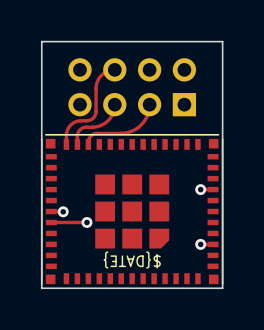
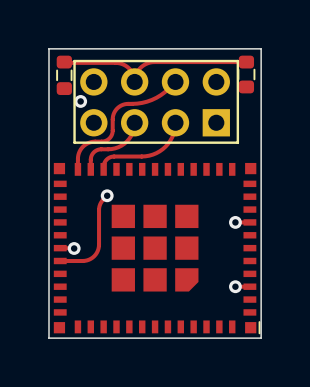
line: none -> (74, 61) (237, 61) (237, 142) (74, 142) (74, 61)
track: none -> (246, 62) (150, 62) (139, 69) (134, 81) (130, 70) (119, 63) (64, 62)
part: none -> (246, 74)
part: none -> (64, 75)
track: (114, 69) (104, 72) (98, 78) (96, 86) (96, 101) -> (175, 81) (164, 92) (151, 99) (119, 106) (115, 111) (112, 119)
via: none -> (80, 101)
part footprint: [40, 133, 224, 285] -> [53, 162, 261, 335]
track: (70, 222) (86, 222) -> (82, 260) (90, 258) (97, 250) (99, 207) (107, 195)
via position: (86, 222) -> (107, 195)

